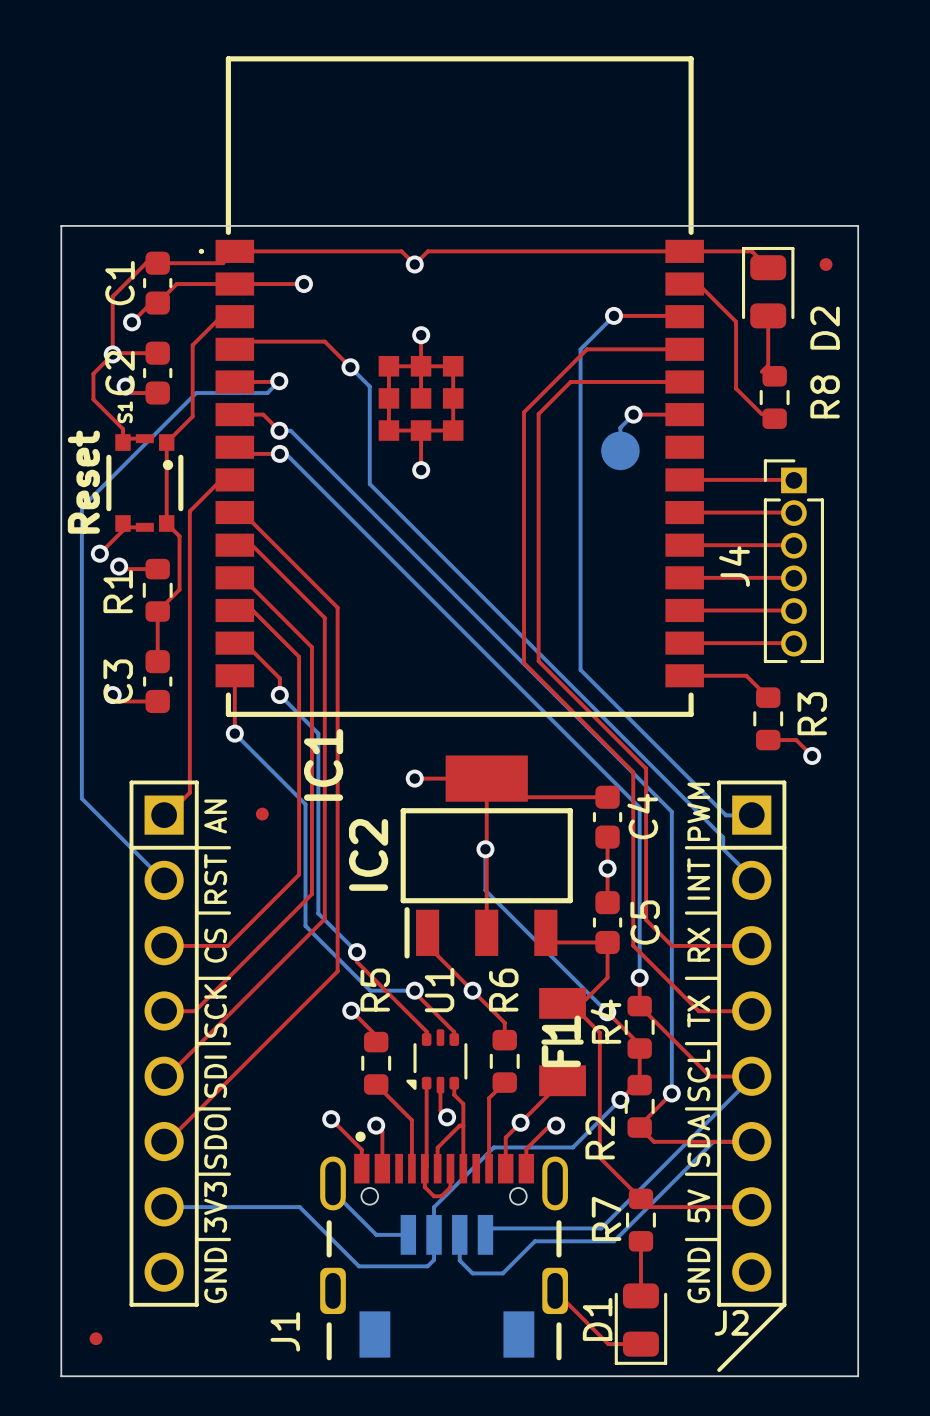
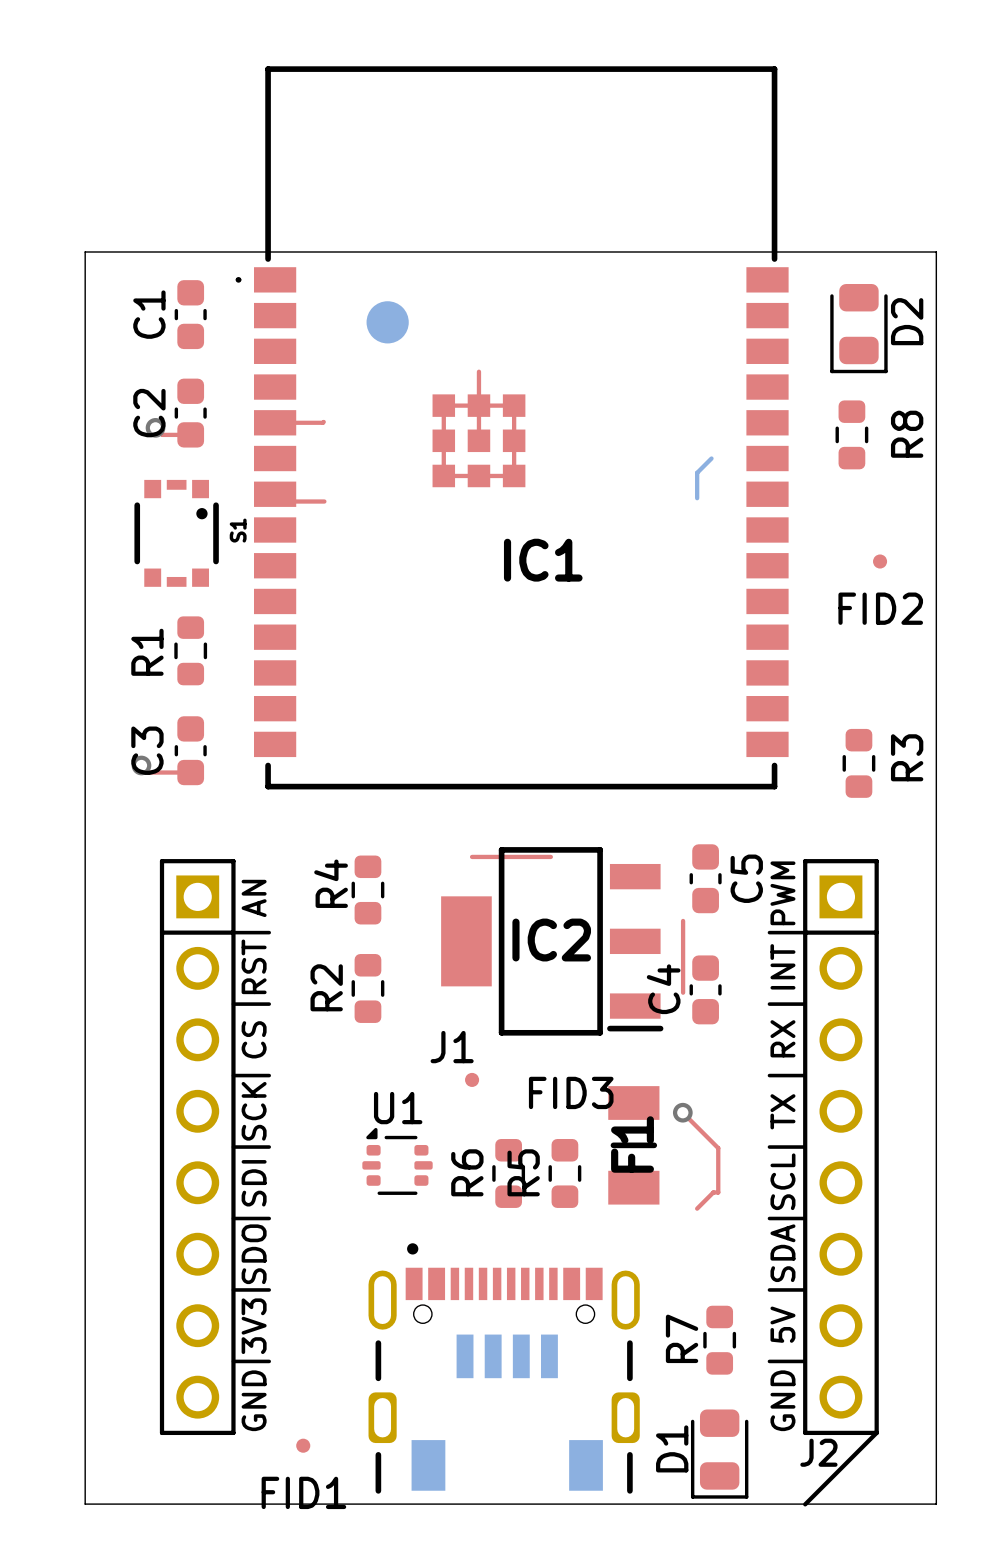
board edge: (838, 225) (858, 225) (858, 1376) (61, 1376) (61, 1369) -> (936, 252) (936, 1504) (85, 1504)
via: (414, 264) -> none
part: (826, 264) -> none
top track: (768, 267) (751, 251) (427, 251) (414, 264) (401, 251) (234, 251) (223, 263) (146, 263) (112, 296) (112, 354) -> none
top track: (303, 284) (176, 284) (157, 303) (151, 303) (132, 322) -> none
via: (303, 284) -> none
top track: (684, 284) (698, 284) (736, 321) (736, 388) (761, 414) -> none
D2 rotation: 0° (768, 287) -> 180° (858, 328)
top track: (613, 315) (684, 316) -> none
bottom track: (613, 315) (580, 349) (580, 669) (726, 815) (754, 815) -> none
via: (613, 315) -> none
top track: (768, 315) (768, 365) (761, 371) -> none
top track: (234, 316) (221, 316) (192, 345) (192, 416) (166, 442) (166, 523) (179, 536) (179, 589) (157, 611) (157, 661) -> none
via: (132, 322) -> none
via: (421, 335) -> none
top track: (234, 349) (242, 341) (324, 341) (350, 367) -> none
top track: (684, 349) (586, 349) (524, 412) (524, 662) (633, 772) (633, 945) (698, 1011) (754, 1011) -> none
top track: (157, 353) (114, 353) (93, 373) (93, 399) (123, 429) (123, 442) (126, 438) (144, 438) -> none
via: (112, 354) -> none
bottom track: (350, 367) (369, 386) (369, 484) (723, 837) (723, 848) (754, 880) -> none
via: (350, 367) -> none
bottom track: (279, 381) (267, 393) (196, 393) (81, 507) (81, 798) (163, 880) (167, 880) -> none
via: (279, 381) -> none
top track: (684, 381) (570, 381) (538, 414) (538, 661) (646, 768) (646, 919) (672, 945) (754, 945) -> none
R8 position: (774, 397) -> (851, 434)
S1 name position: S1 (125, 412) -> S1 (238, 530)
top track: (234, 414) (263, 414) (279, 430) -> none
top track: (633, 414) (684, 414) -> none
via: (633, 414) -> none
bottom track: (279, 430) (290, 430) (671, 811) (671, 1093) -> none
via: (279, 430) -> none
top track: (421, 430) (421, 470) -> none
part position: (620, 450) -> (387, 322)
bottom track: (279, 453) (285, 453) (639, 807) (639, 977) -> none
via: (279, 453) -> none
via: (421, 470) -> none
top track: (234, 479) (221, 479) (189, 511) (189, 792) (167, 815) -> none
top track: (684, 479) (793, 480) -> none
text: Reset (83, 482) -> none
FID2: none -> (880, 561)
top track: (234, 512) (242, 512) (337, 607) (337, 971) (167, 1141) -> none
top track: (684, 512) (793, 513) -> none
top track: (144, 527) (126, 527) (123, 523) (123, 530) (99, 553) -> none
top track: (234, 545) (252, 545) (324, 617) (324, 918) (167, 1076) -> none
top track: (684, 545) (793, 545) -> none
via: (99, 553) -> none
J4: (793, 561) -> none
top track: (119, 566) (121, 569) (157, 569) -> none
via: (119, 566) -> none
top track: (234, 577) (242, 577) (311, 647) (311, 894) (194, 1011) (167, 1011) -> none
top track: (684, 577) (793, 578) -> none
top track: (234, 610) (252, 610) (299, 656) (299, 874) (227, 945) (167, 945) -> none
top track: (684, 610) (793, 611) -> none
top track: (234, 643) (244, 643) (279, 678) (279, 695) -> none
top track: (684, 643) (793, 643) -> none
top track: (688, 671) (684, 675) (746, 675) (768, 697) -> none
top track: (234, 675) (234, 733) -> none
bottom track: (279, 695) (318, 733) (318, 913) (356, 952) -> none
via: (279, 695) -> none
R3 position: (768, 718) -> (858, 763)
bottom track: (234, 733) (305, 804) (305, 925) (370, 990) (414, 990) -> none
via: (234, 733) -> none
top track: (768, 740) (796, 740) (812, 755) -> none
via: (812, 755) -> none
IC1 name rotation: 0° (323, 764) -> 90° clockwise (543, 560)
IC1 name position: IC1 (323, 764) -> IC1 (543, 560)
via: (414, 778) -> none
top track: (607, 797) (505, 797) (486, 778) (486, 932) -> none
part: (262, 814) -> none
C4 name position: C4 (642, 816) -> C4 (663, 989)
C4 position: (607, 817) -> (705, 989)
bottom track: (485, 849) (485, 890) (607, 1012) -> none
via: (485, 849) -> none
IC2 name position: IC2 (368, 854) -> IC2 (551, 940)
IC2 rotation: 0° (486, 857) -> 90° counterclockwise (552, 941)
via: (607, 868) -> none
C5 position: (607, 922) -> (705, 878)
top track: (427, 932) (427, 945) (504, 1022) (504, 1040) -> none
top track: (545, 932) (555, 942) (607, 942) (607, 977) (575, 1009) -> none
top track: (356, 952) (356, 961) (426, 1031) (426, 1039) -> none
via: (356, 952) -> none
top track: (639, 977) (639, 1006) (710, 1076) (754, 1076) -> none
via: (639, 977) -> none
FID3: none -> (472, 1079)
R5 name position: R5 (375, 990) -> R5 (523, 1172)
top track: (414, 990) (454, 1032) (454, 1039) -> none
via: (414, 990) -> none
via: (472, 990) -> none
R6 name position: R6 (503, 990) -> R6 (467, 1172)
top track: (562, 1003) (570, 1003) (599, 1032) (599, 1157) (649, 1207) (754, 1207) -> none
top track: (351, 1010) (376, 1035) (376, 1042) -> none
via: (351, 1010) -> none
R4 position: (639, 1027) -> (367, 890)
U1 rotation: 0° (436, 1061) -> 90° clockwise (397, 1161)
U1 position: (436, 1061) -> (397, 1161)
R6 position: (504, 1061) -> (508, 1173)
R5 position: (376, 1063) -> (564, 1173)
bottom track: (754, 1076) (601, 1228) (491, 1228) (485, 1234) -> none
top track: (562, 1080) (505, 1137) (505, 1168) -> none
top track: (504, 1082) (489, 1098) (489, 1168) -> none
top track: (426, 1083) (426, 1166) (424, 1168) (424, 1187) (434, 1196) (441, 1196) (450, 1187) (450, 1168) -> none
top track: (454, 1083) (454, 1094) (463, 1103) (463, 1168) -> none
top track: (376, 1084) (411, 1120) (411, 1168) -> none
top track: (440, 1085) (440, 1110) (447, 1117) (445, 1117) -> none
top track: (671, 1093) (639, 1125) (653, 1141) (754, 1141) -> none
via: (671, 1093) -> none
bottom track: (620, 1099) (572, 1147) (493, 1147) (434, 1207) (434, 1259) (427, 1266) (359, 1266) (299, 1207) (167, 1207) -> none
via: (620, 1099) -> none
R2 position: (639, 1106) -> (367, 988)
via: (447, 1117) -> none
top track: (331, 1119) (361, 1149) (361, 1168) -> none
via: (331, 1119) -> none
via: (520, 1122) -> none
top track: (376, 1125) (382, 1131) (382, 1168) -> none
via: (376, 1125) -> none
top track: (463, 1125) (459, 1125) (437, 1147) (437, 1168) -> none
top track: (556, 1125) (549, 1125) (526, 1149) (526, 1168) -> none
via: (556, 1125) -> none
R2 name position: R2 (600, 1137) -> R2 (326, 987)
bottom track: (754, 1141) (713, 1141) (613, 1241) (534, 1241) (502, 1273) (472, 1273) (459, 1260) (459, 1234) -> none
bottom track: (333, 1183) (333, 1191) (376, 1234) (408, 1234) -> none
top track: (640, 1241) (640, 1295) -> none
top track: (555, 1290) (608, 1344) (640, 1344) -> none
FID1: none -> (303, 1445)
J1 name rotation: 0° (285, 1331) -> 90° clockwise (452, 1047)
J1 name position: J1 (285, 1331) -> J1 (452, 1047)
part: (96, 1338) -> none

